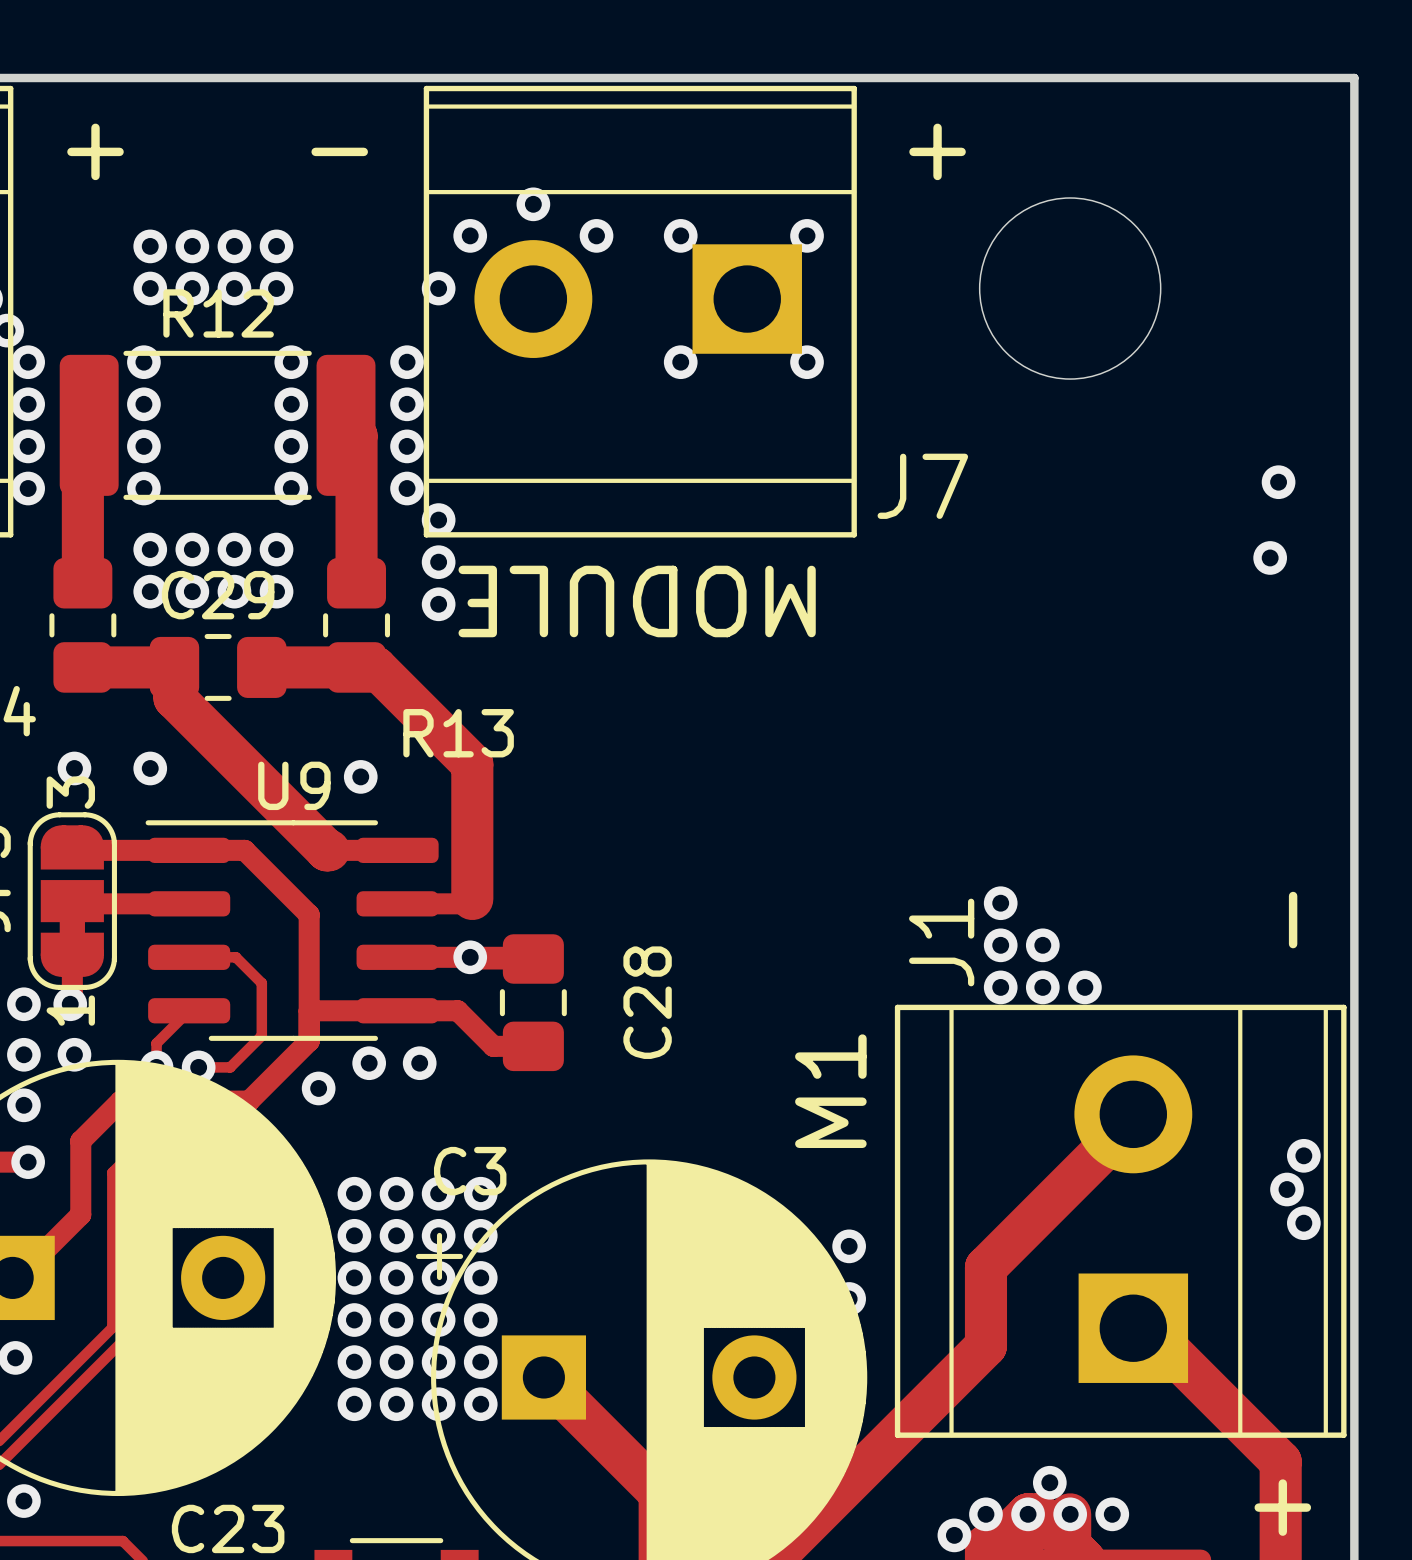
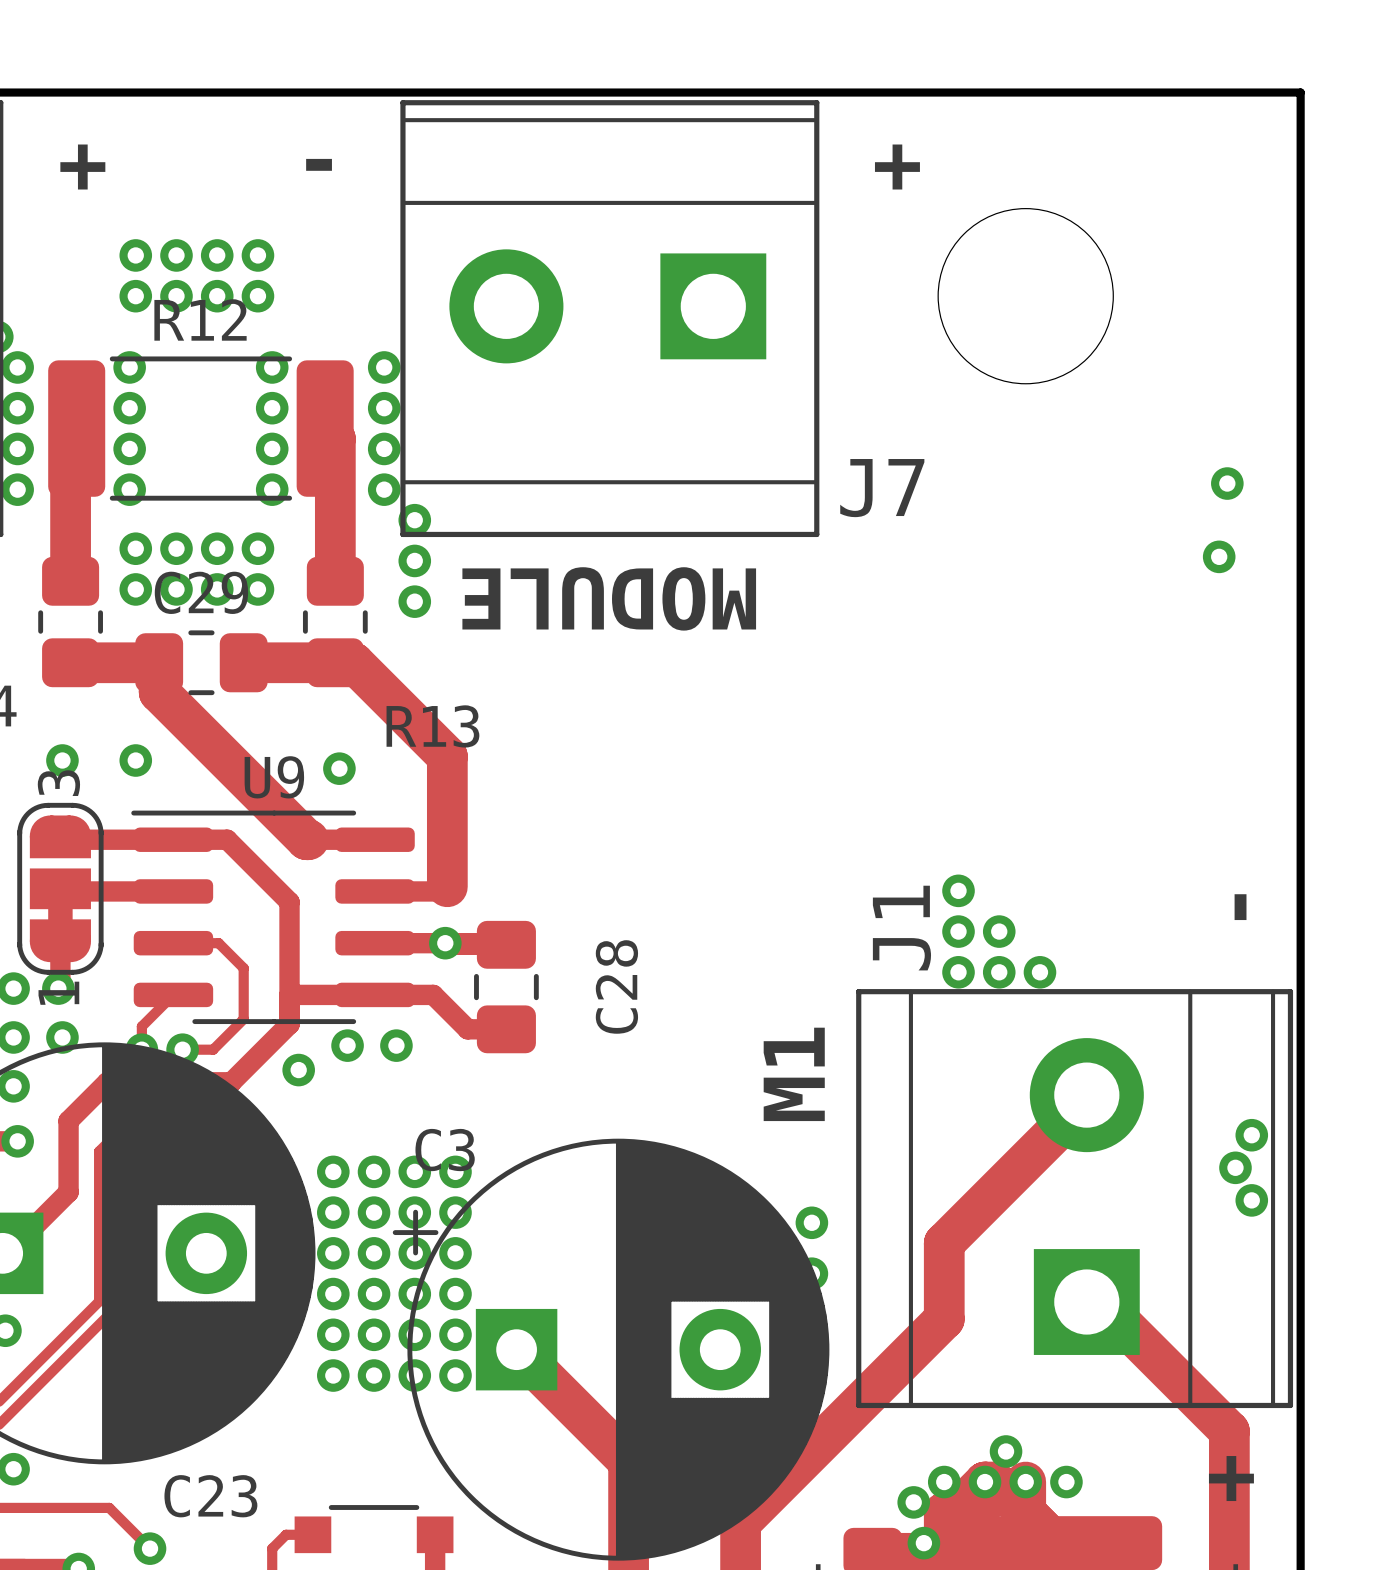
via: (533, 204) -> none
via: (470, 235) -> none
via: (596, 235) -> none
via: (680, 235) -> none
via: (807, 235) -> none
via: (438, 288) -> none
via: (680, 362) -> none
via: (807, 362) -> none

